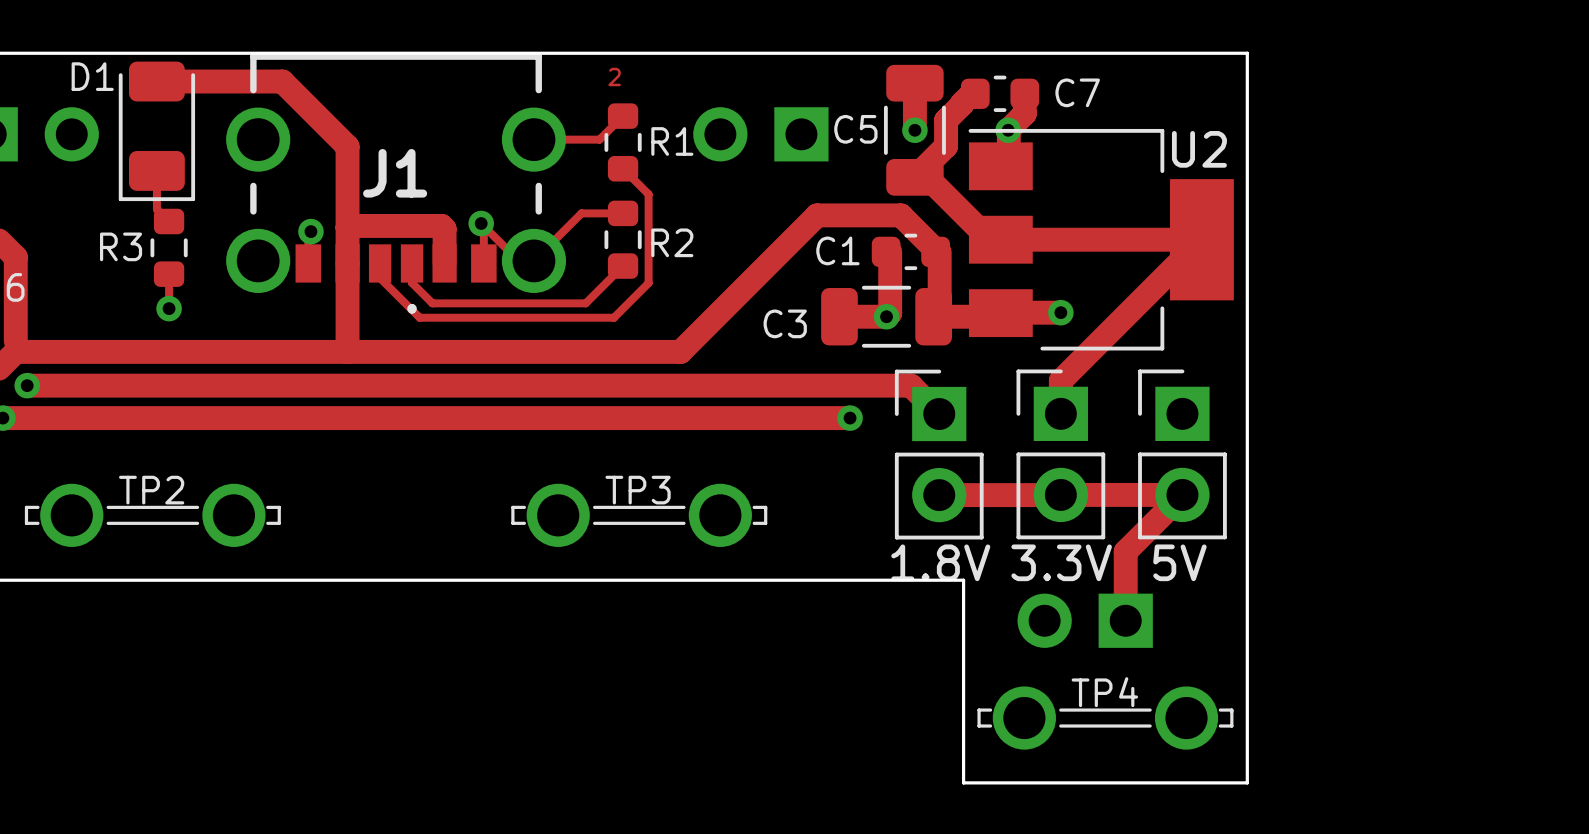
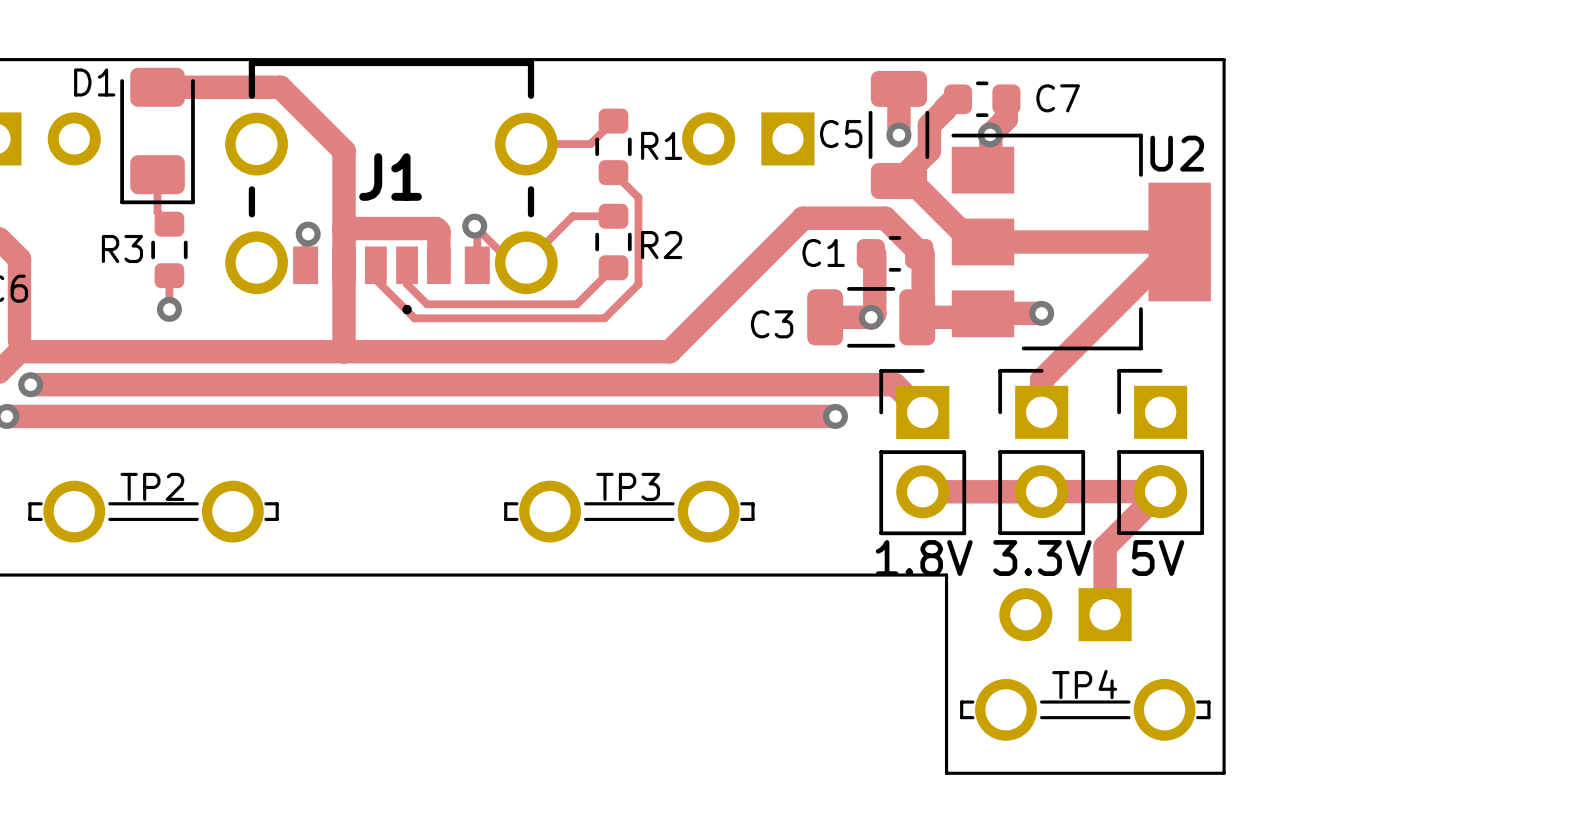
text: 2 (614, 76) -> none

